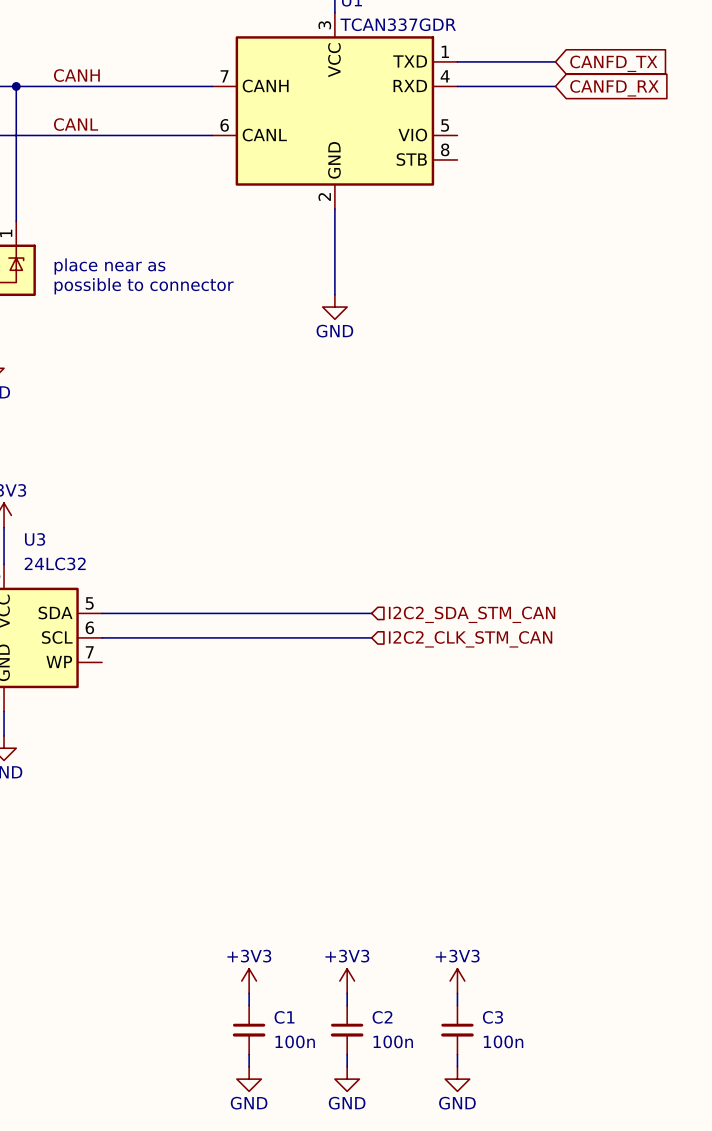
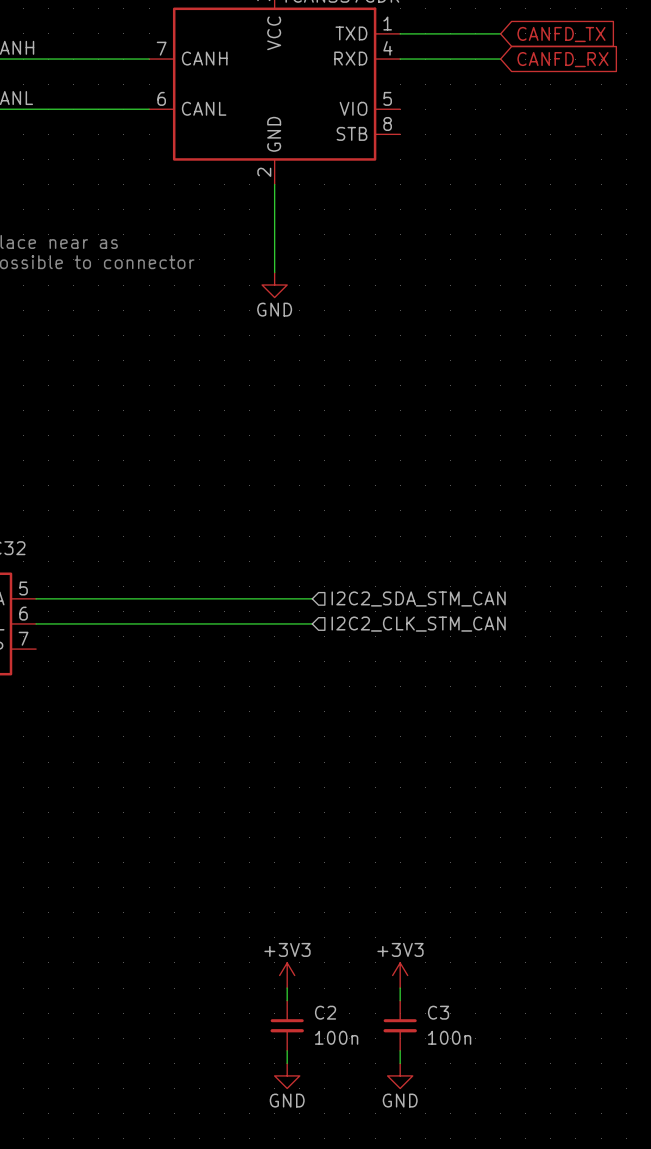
power symbol: +3V3 (249, 981) -> none
wire: (249, 993) (249, 1005) -> none
C1: 100n (249, 1030) -> none
wire: (249, 1054) (249, 1066) -> none
power symbol: GND (249, 1079) -> none

